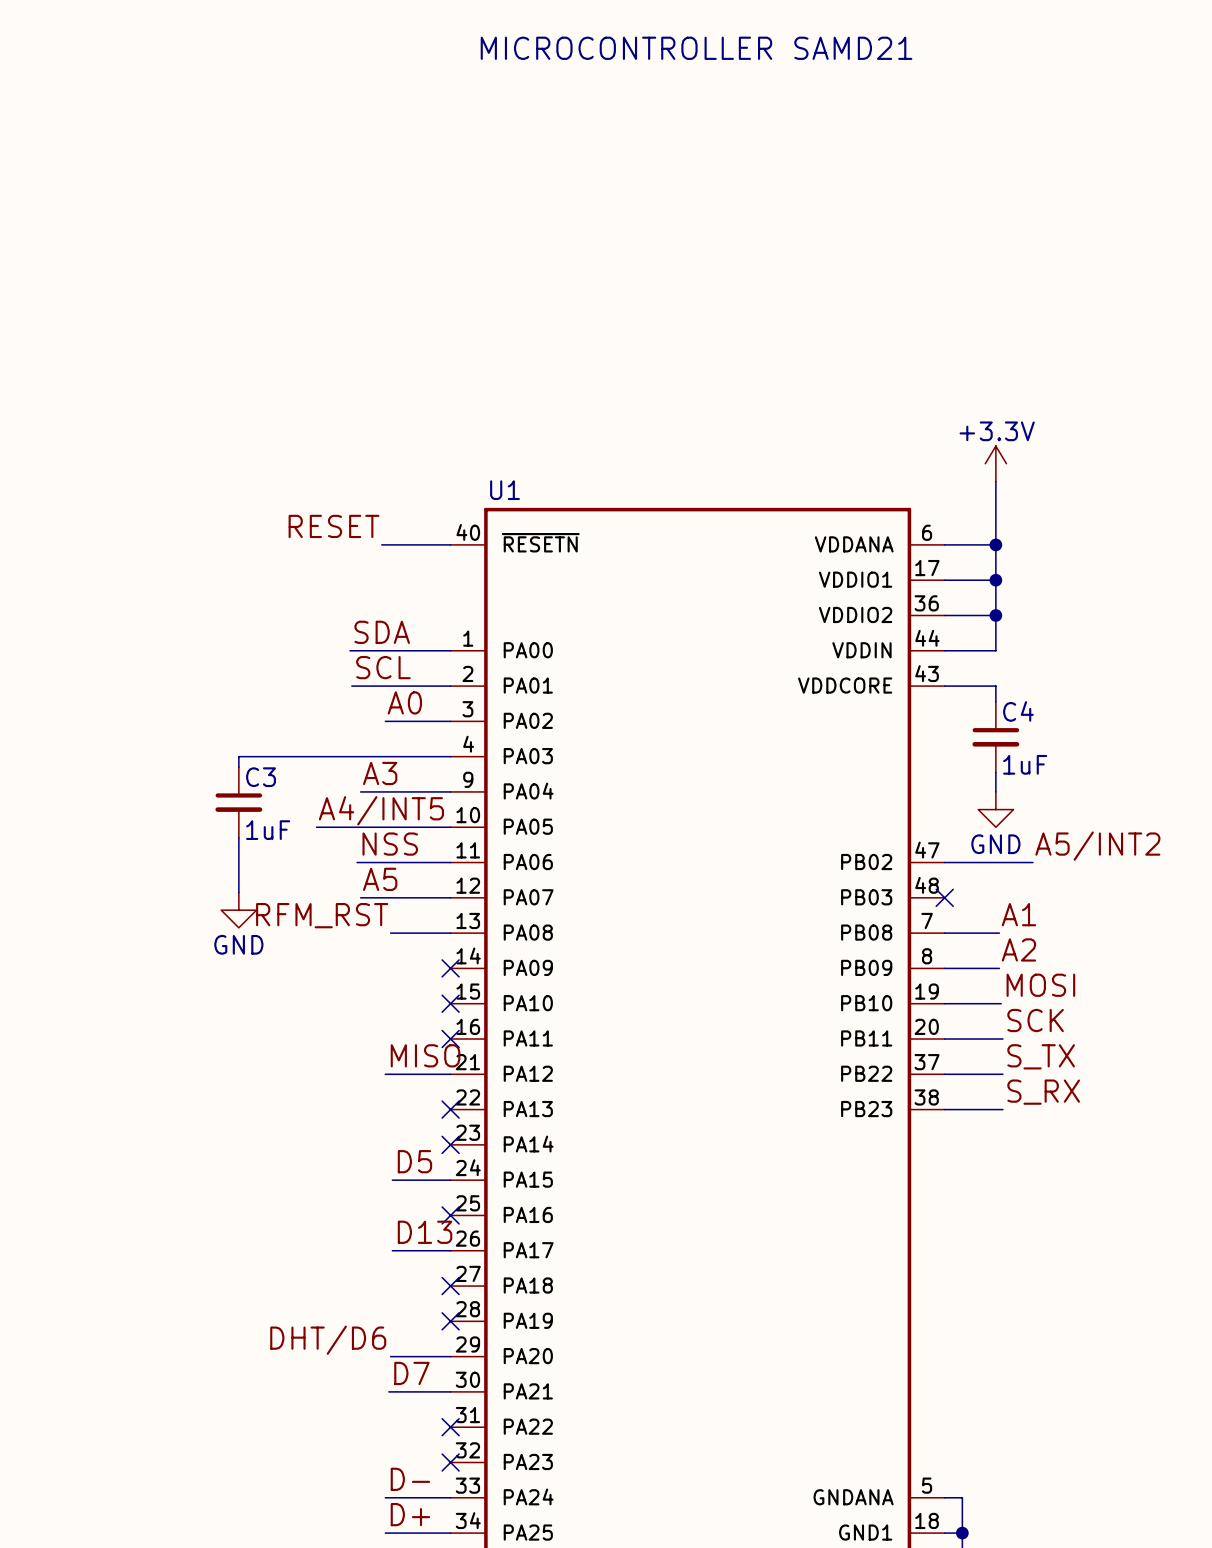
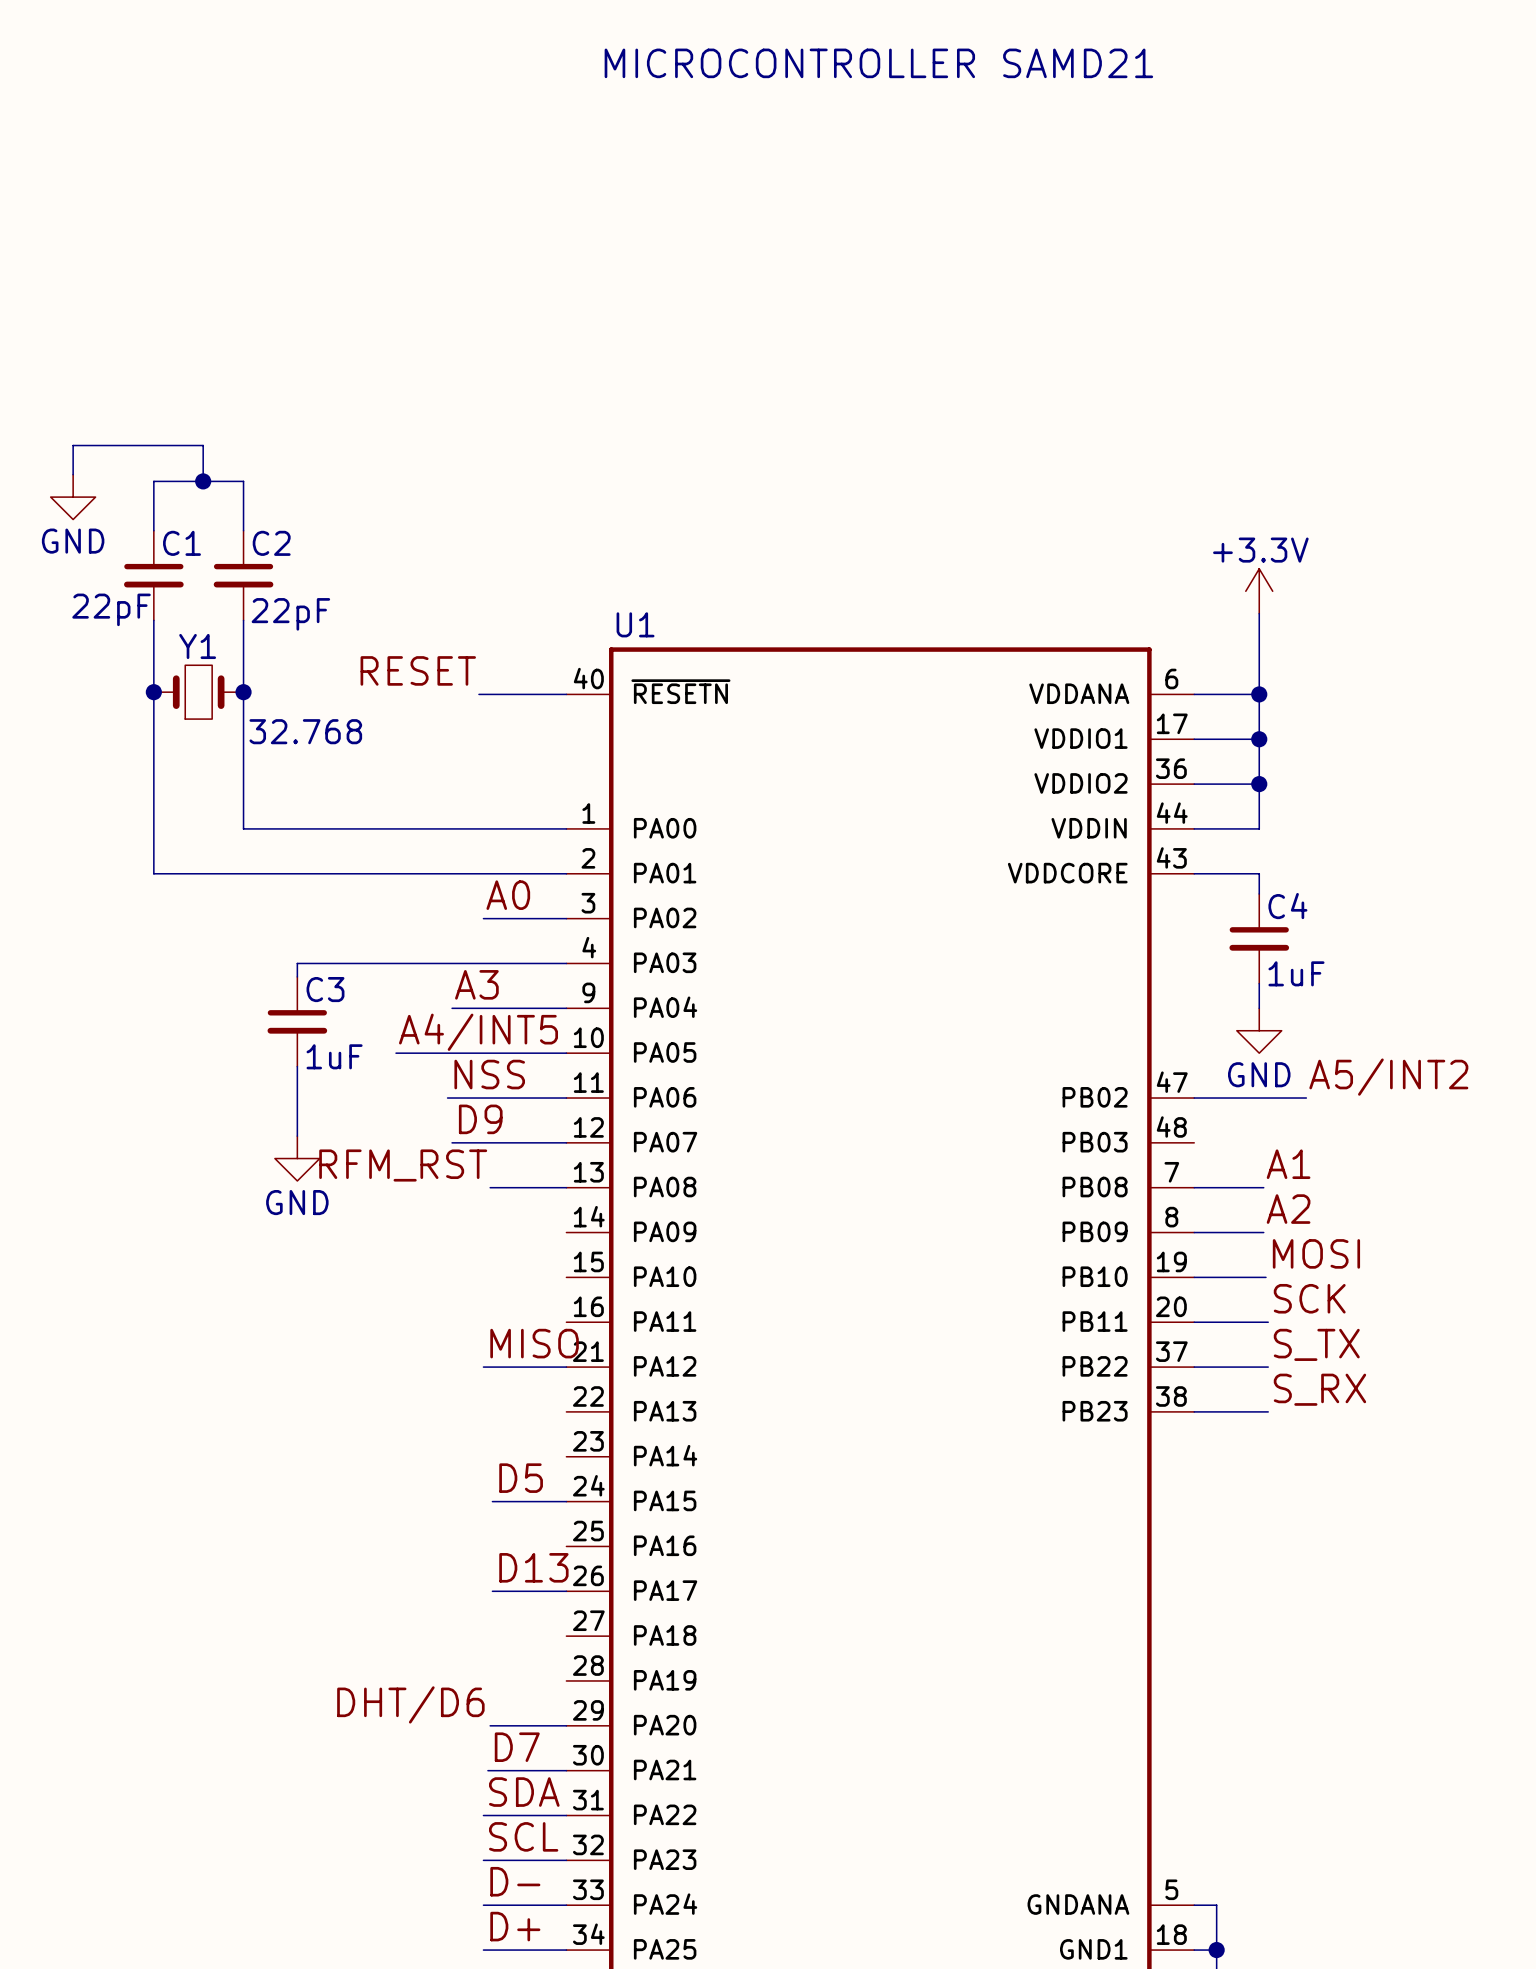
wire: none -> (73, 474) (73, 445) (203, 445) (203, 481)
junction: none -> (203, 481)
power symbol: none -> GND (73, 497)
wire: none -> (153, 530) (153, 481) (243, 481) (243, 530)
C1: none -> 22pF (153, 575)
C2: none -> 22pF (243, 575)
wire: none -> (153, 620) (153, 873) (440, 873)
wire: none -> (243, 620) (243, 828) (438, 828)
junction: none -> (153, 692)
Y1: none -> 32.768 (198, 692)
junction: none -> (243, 692)
label: SDA (382, 632) -> none
label: SCL (383, 667) -> none
label: A5 (380, 879) -> D9 (480, 1119)
no-connect mark: (944, 897) -> none
no-connect mark: (450, 968) -> none
no-connect mark: (450, 1003) -> none
no-connect mark: (450, 1039) -> none
no-connect mark: (450, 1109) -> none
no-connect mark: (450, 1144) -> none
no-connect mark: (450, 1215) -> none
no-connect mark: (450, 1286) -> none
no-connect mark: (450, 1321) -> none
label: none -> SDA (524, 1792)
wire: none -> (483, 1815) (566, 1815)
no-connect mark: (450, 1427) -> none
label: none -> SCL (523, 1836)
wire: none -> (483, 1860) (566, 1860)
no-connect mark: (450, 1462) -> none

